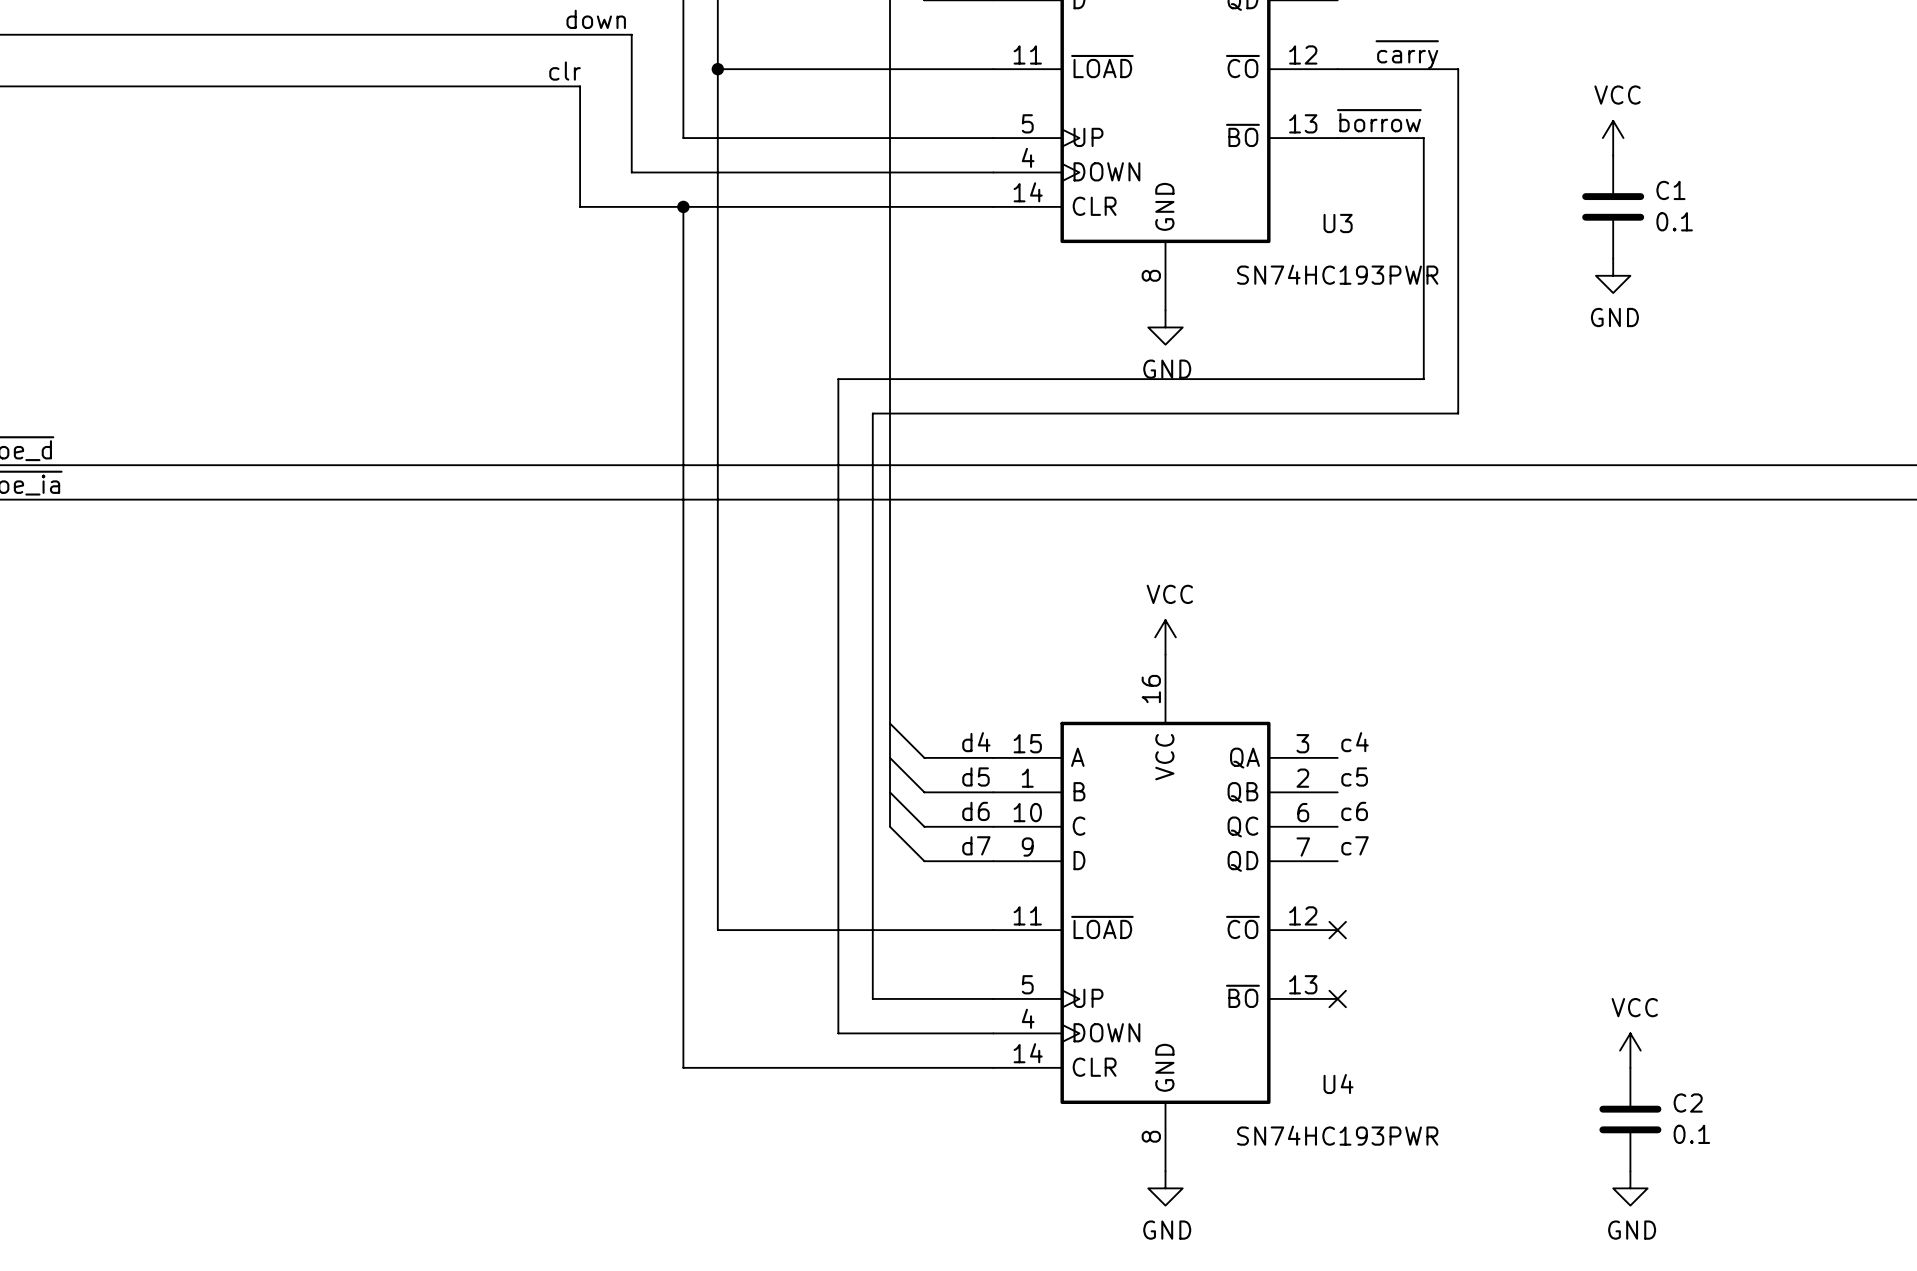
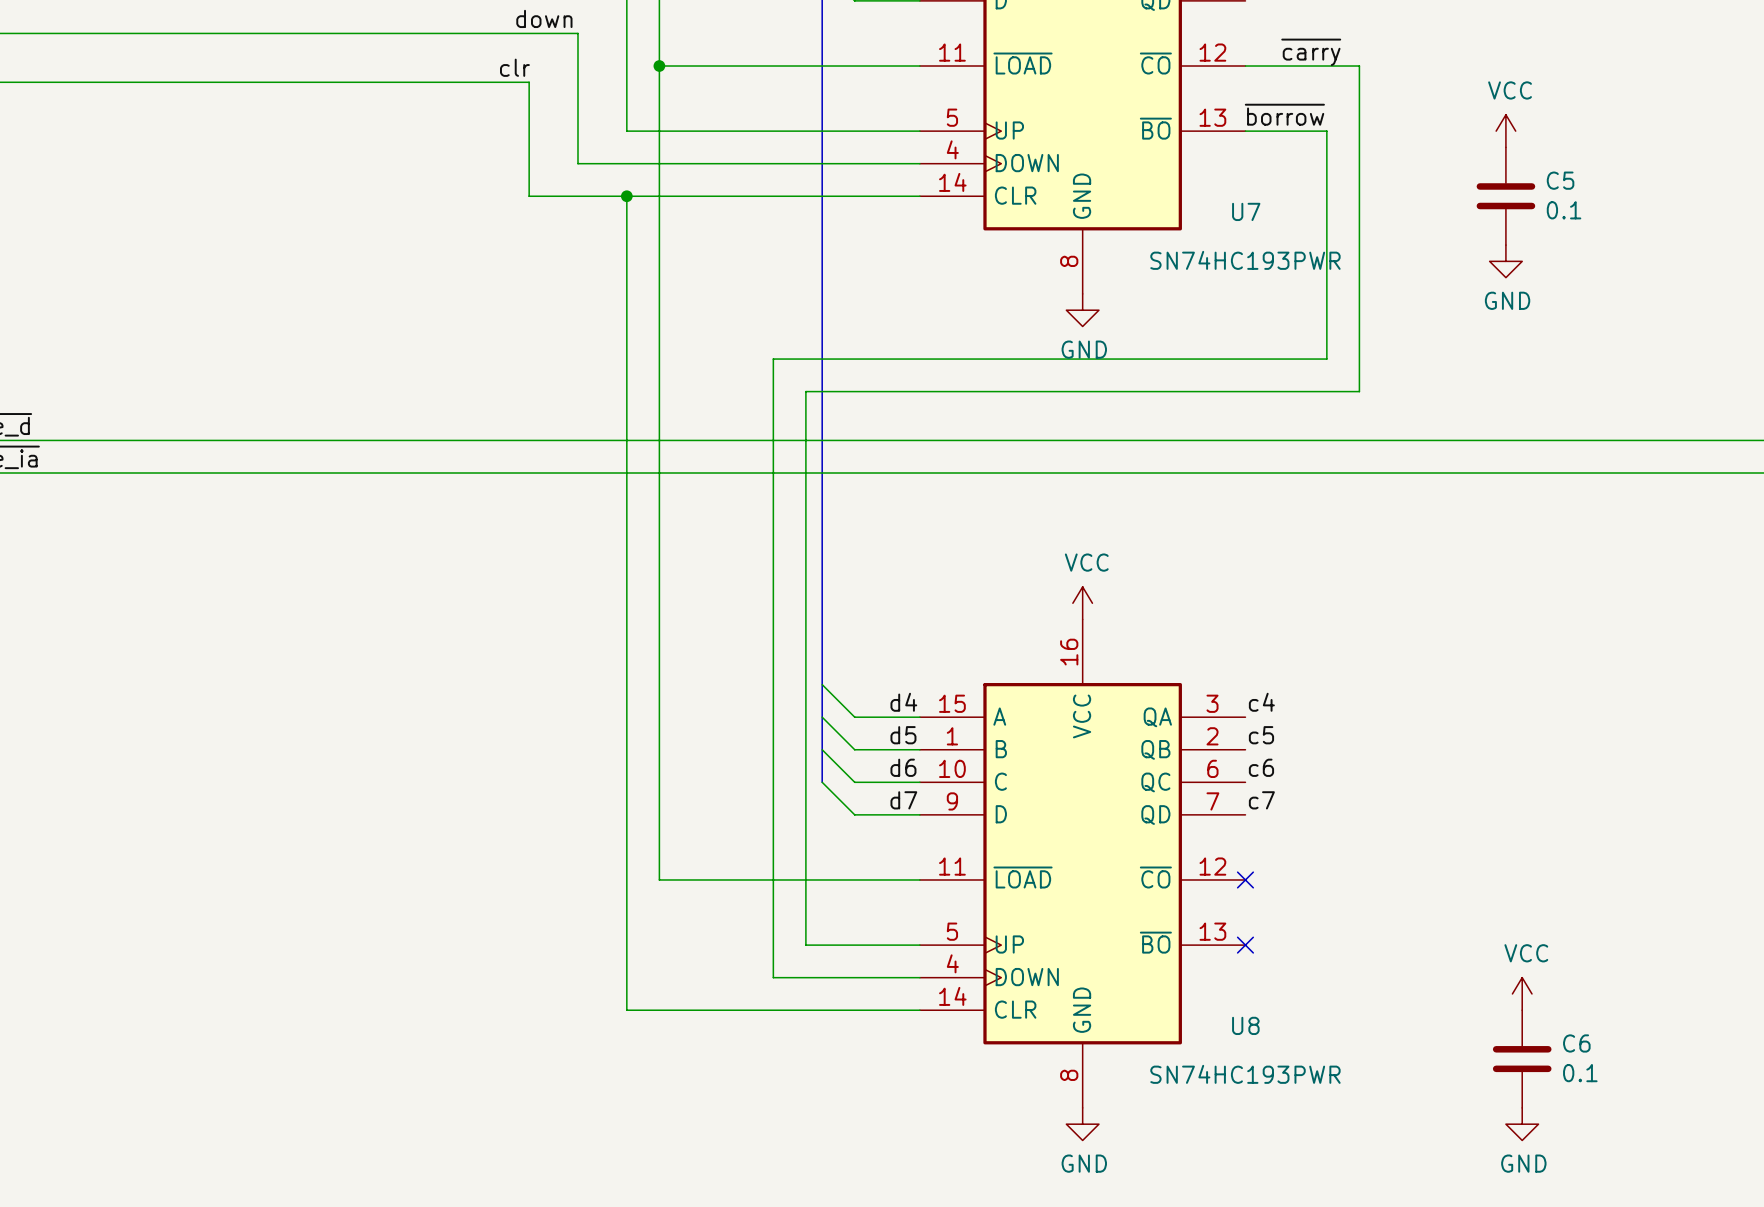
C1 name: C1 (1670, 190) -> C5 (1560, 180)
U3 name: U3 (1338, 223) -> U7 (1246, 211)
U4 name: U4 (1338, 1084) -> U8 (1245, 1025)
C2 name: C2 (1688, 1103) -> C6 (1576, 1043)

